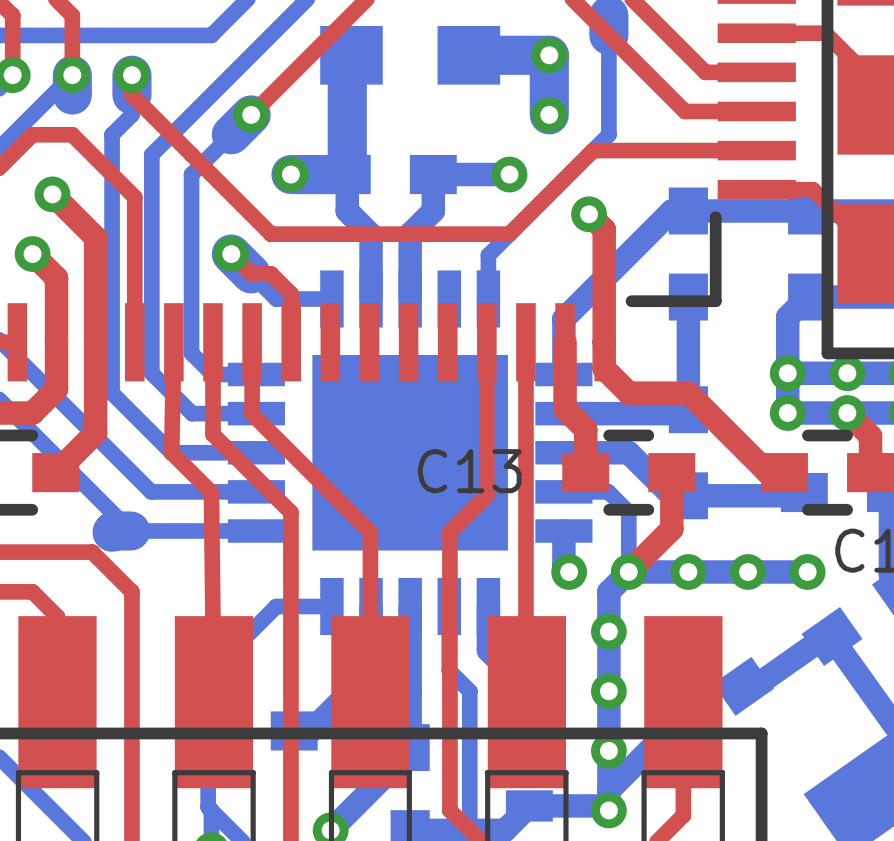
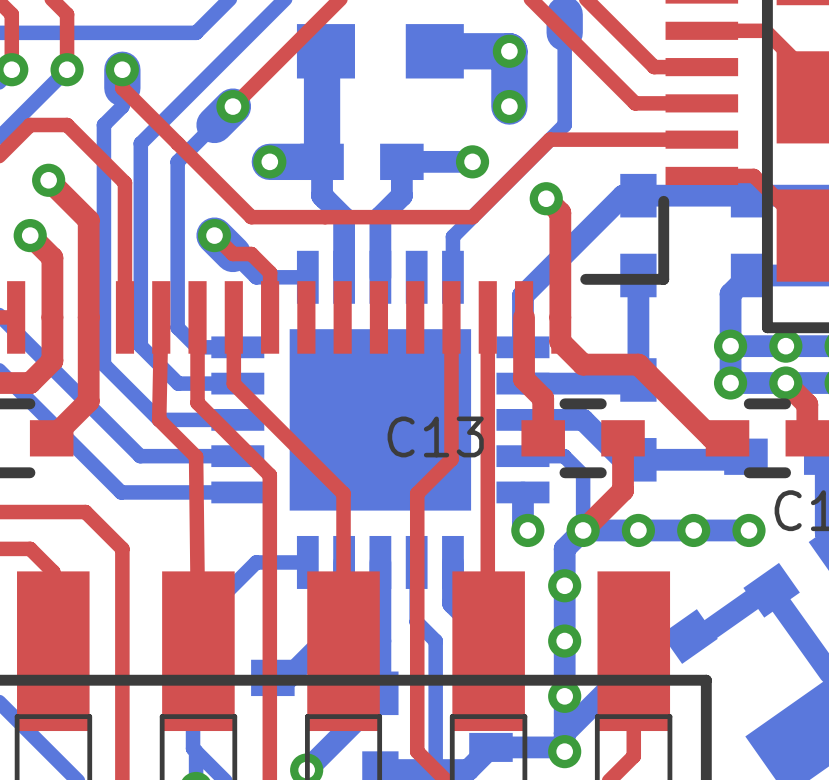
bottom track: (72, 75) (72, 95) -> none
bottom track: (130, 530) (112, 532) -> none

